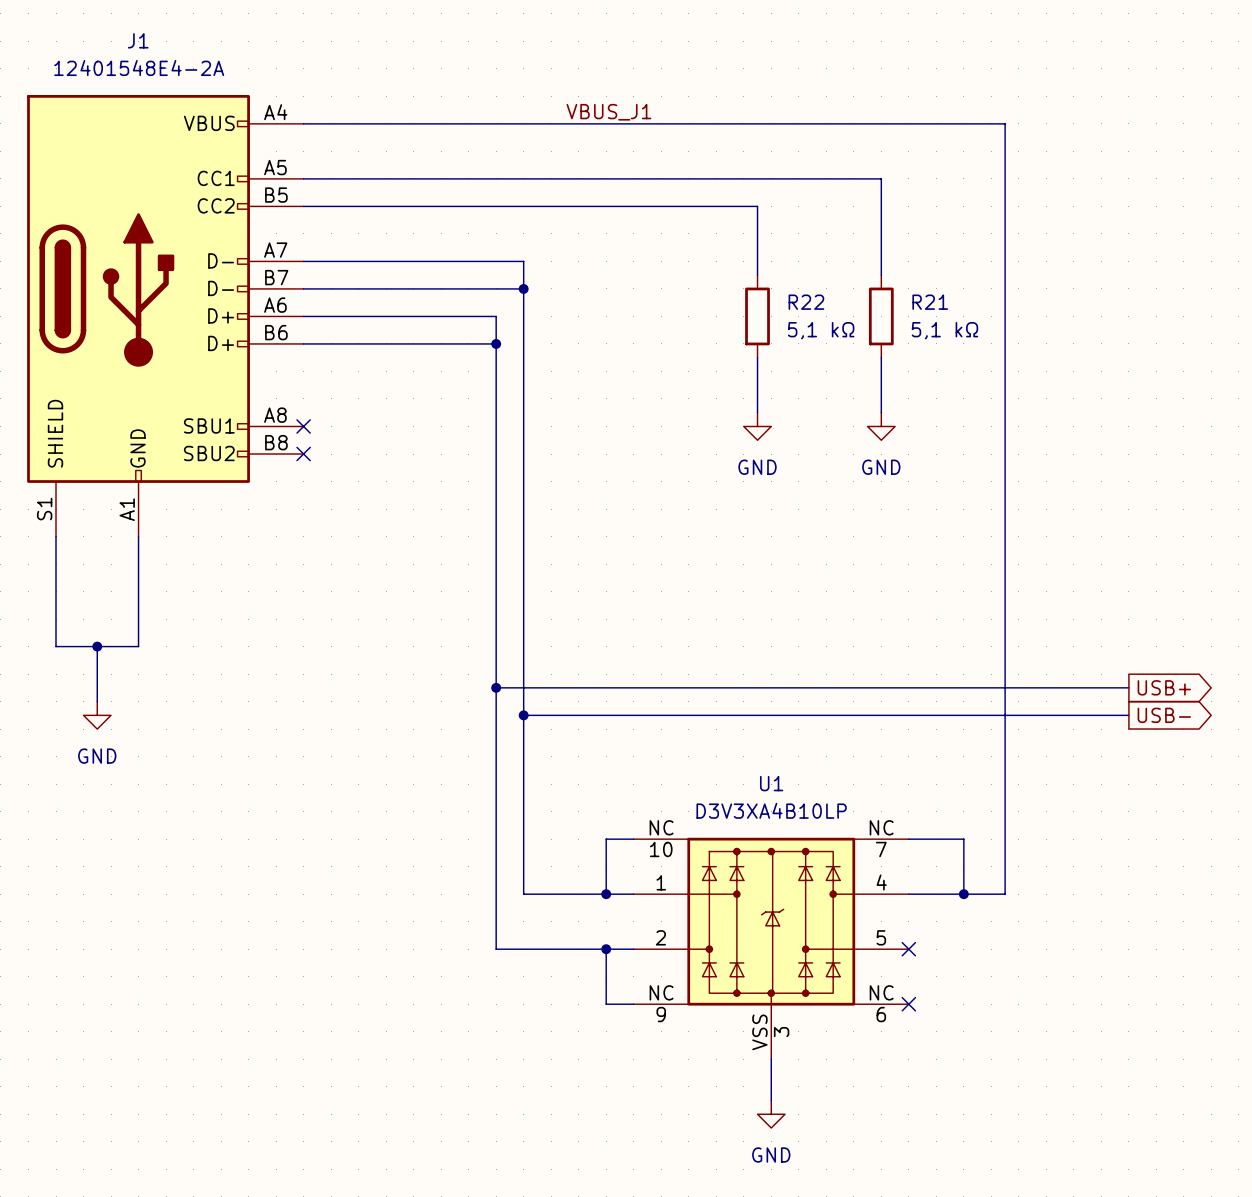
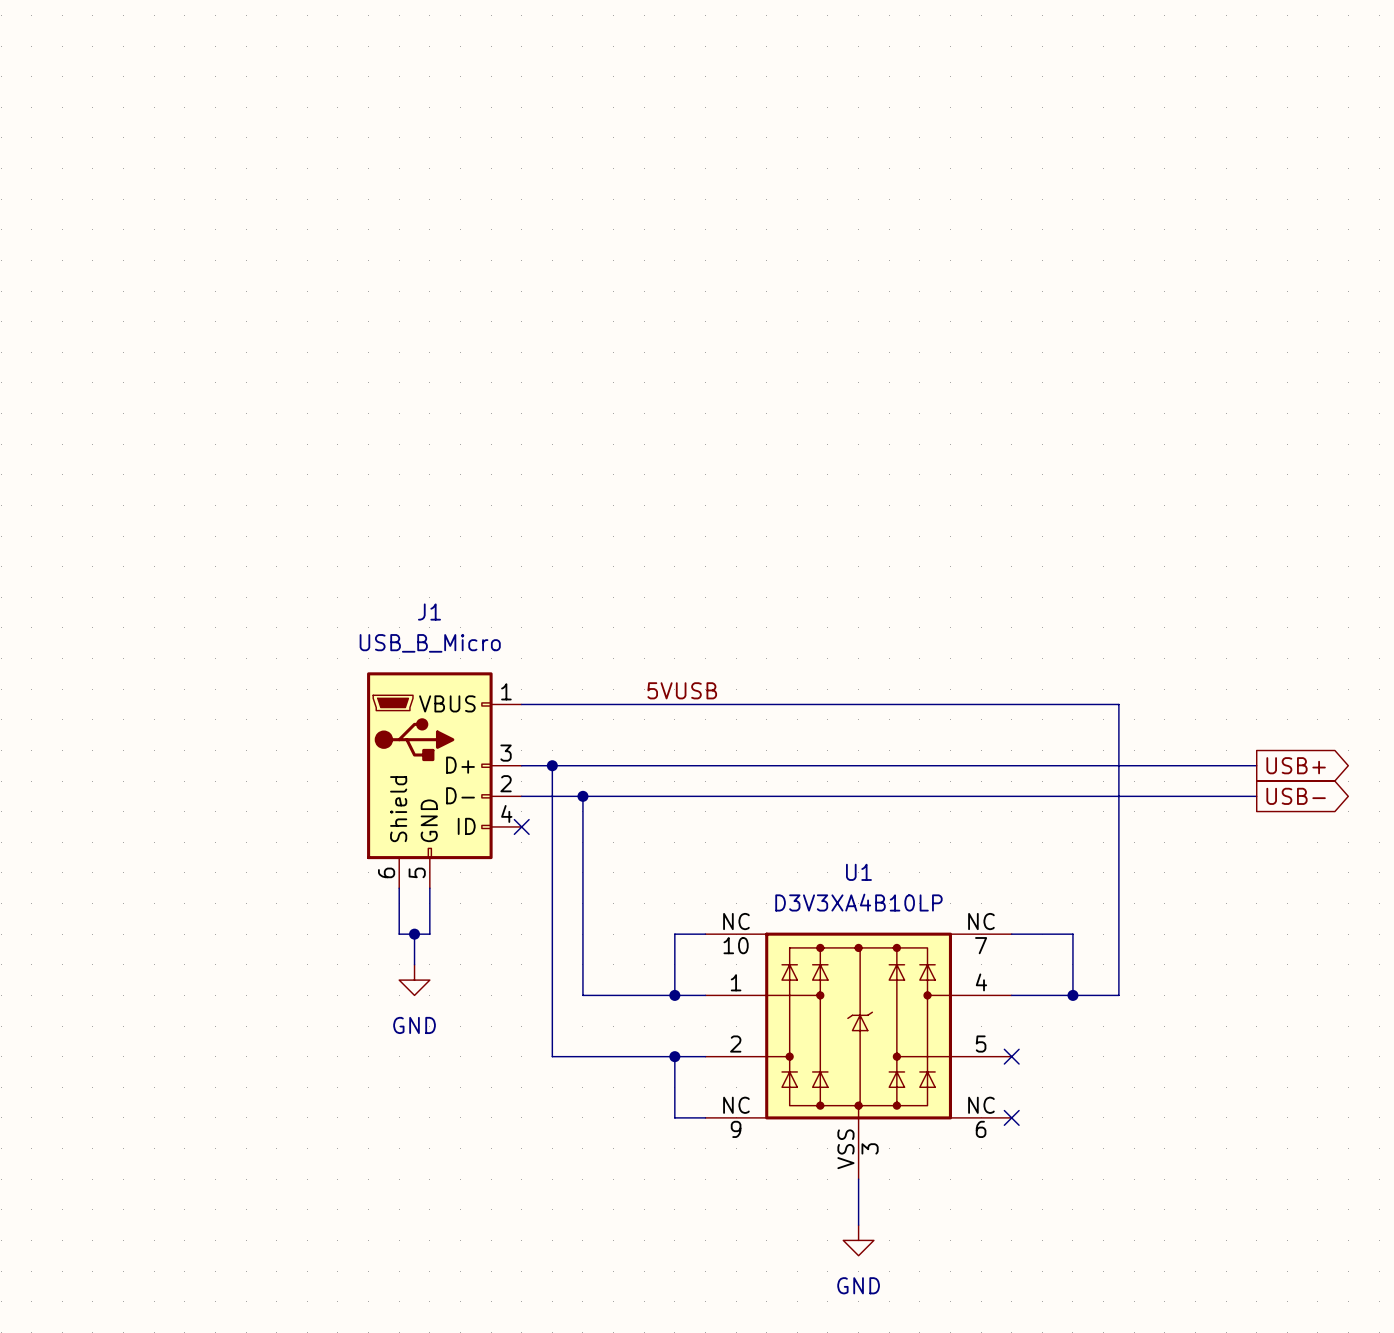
J1 name position: J1 (138, 40) -> J1 (429, 612)
J1 value: 12401548E4-2A (139, 68) -> USB_B_Micro (430, 643)
J1 symbol: [27, 94, 304, 537] -> [367, 672, 522, 889]
label: VBUS_J1 (608, 112) -> none
wire: (303, 123) (1005, 123) (1005, 632) -> (521, 704) (1118, 704)
wire: (303, 178) (881, 178) (881, 275) -> none
wire: (303, 206) (757, 206) (757, 275) -> none
wire: (303, 261) (523, 261) (523, 715) -> (521, 796) (582, 796)
wire: (303, 288) (523, 288) -> none
junction: (523, 288) -> none
wire: (303, 316) (496, 316) (496, 687) -> (521, 765) (552, 765)
R22: 5,1 kΩ (757, 316) -> none
R21: 5,1 kΩ (881, 316) -> none
wire: (303, 343) (496, 343) -> none
junction: (496, 343) -> none
wire: (757, 357) (757, 412) -> none
wire: (881, 357) (881, 412) -> none
no-connect mark: (303, 426) -> none
power symbol: GND (757, 426) -> none
power symbol: GND (881, 426) -> none
no-connect mark: (303, 454) -> none
wire: (56, 536) (56, 646) (138, 646) (138, 536) -> none
label: none -> 5VUSB (682, 690)
wire: (97, 646) (97, 701) -> none
junction: (97, 646) -> none
power symbol: GND (97, 715) -> none
no-connect mark: none -> (521, 826)
wire: none -> (399, 888) (399, 934) (429, 934) (429, 888)
wire: none -> (414, 934) (414, 964)
junction: none -> (414, 934)
power symbol: none -> GND (414, 980)

